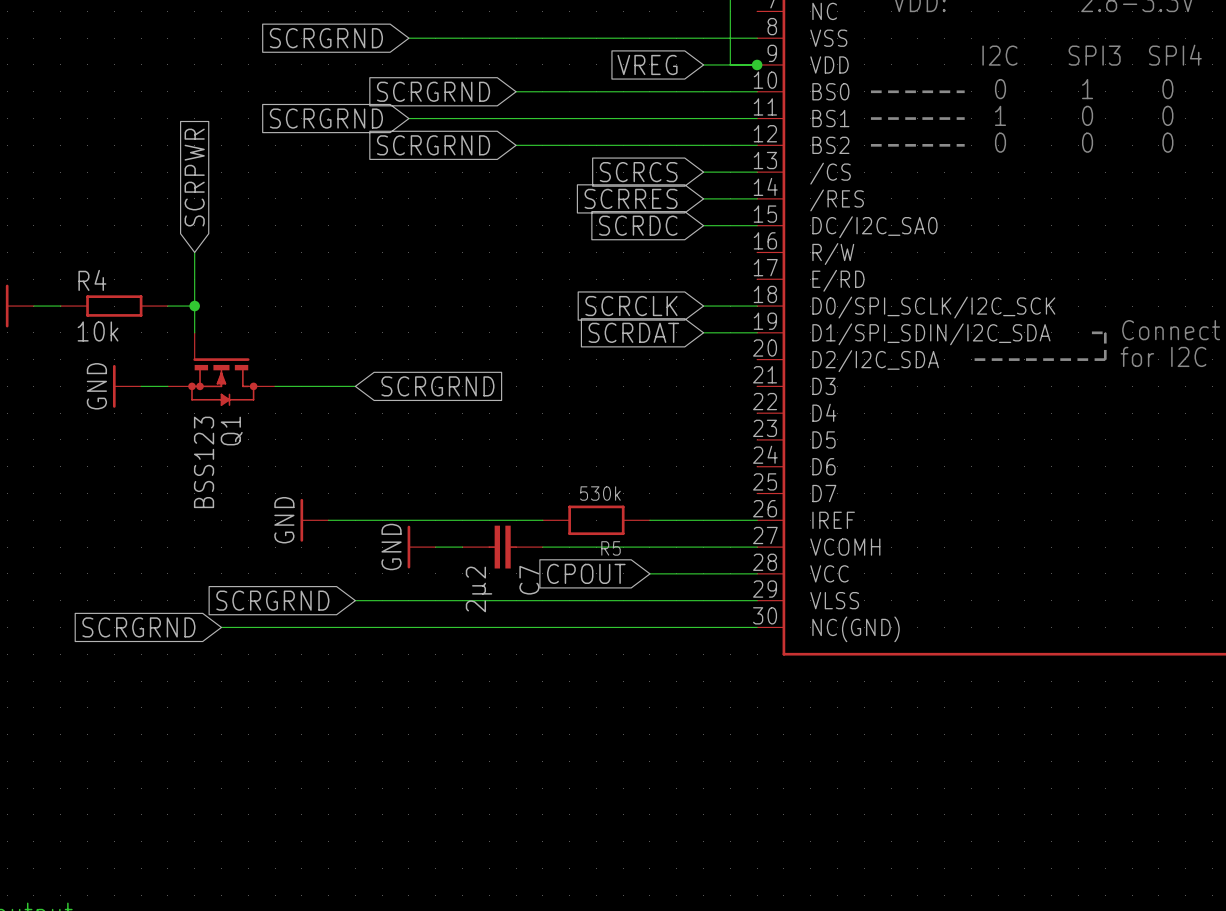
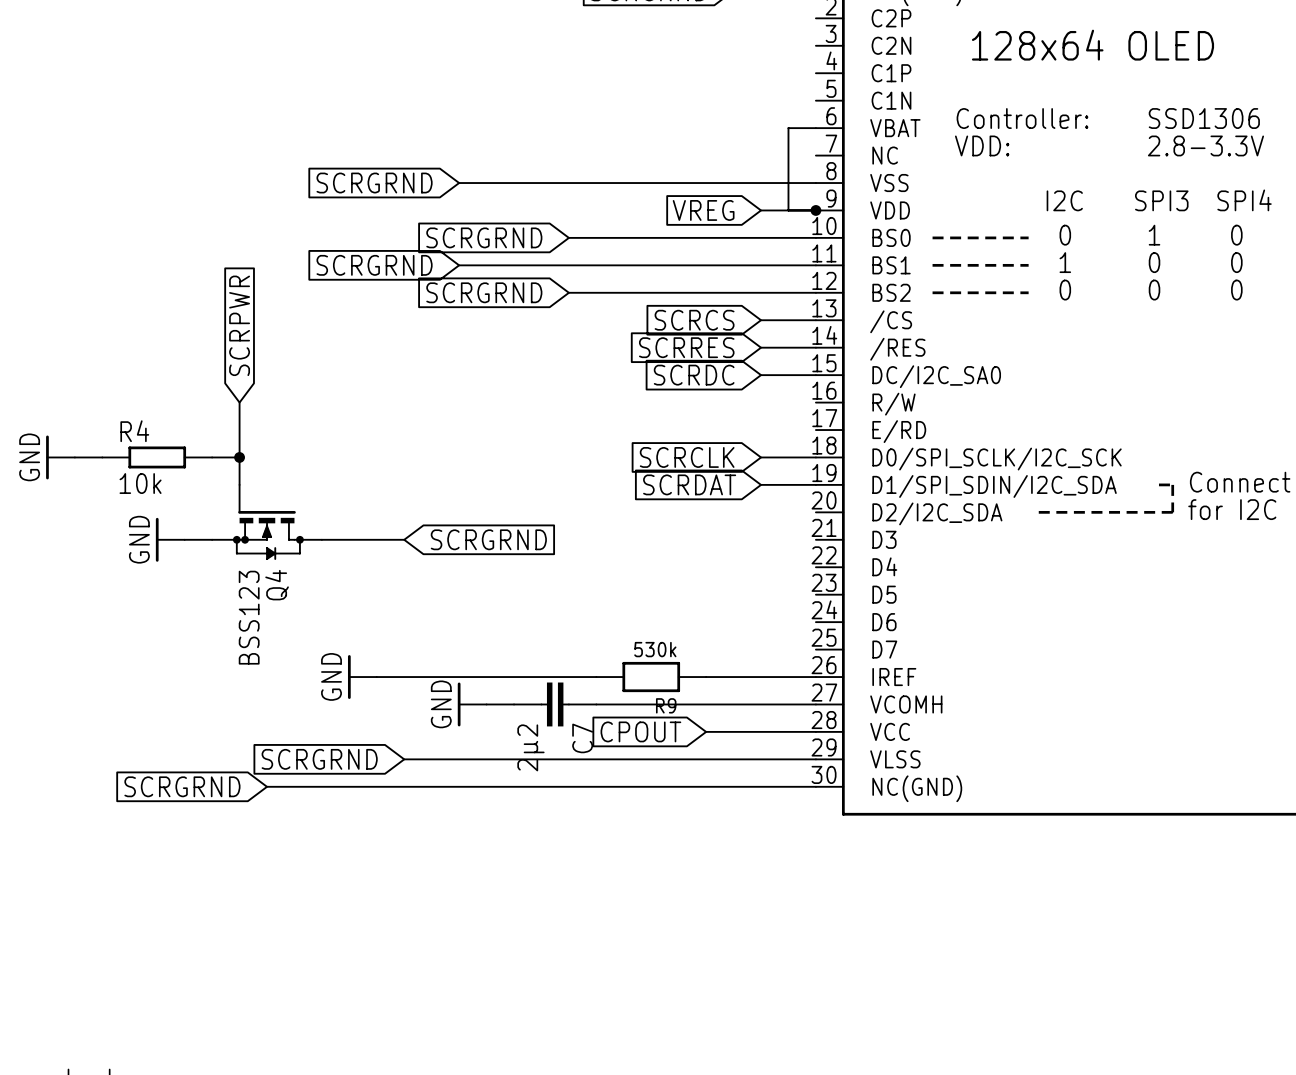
Q1 name: Q1 (231, 431) -> Q4 (277, 585)
R5 name: R5 (611, 548) -> R9 (666, 705)

